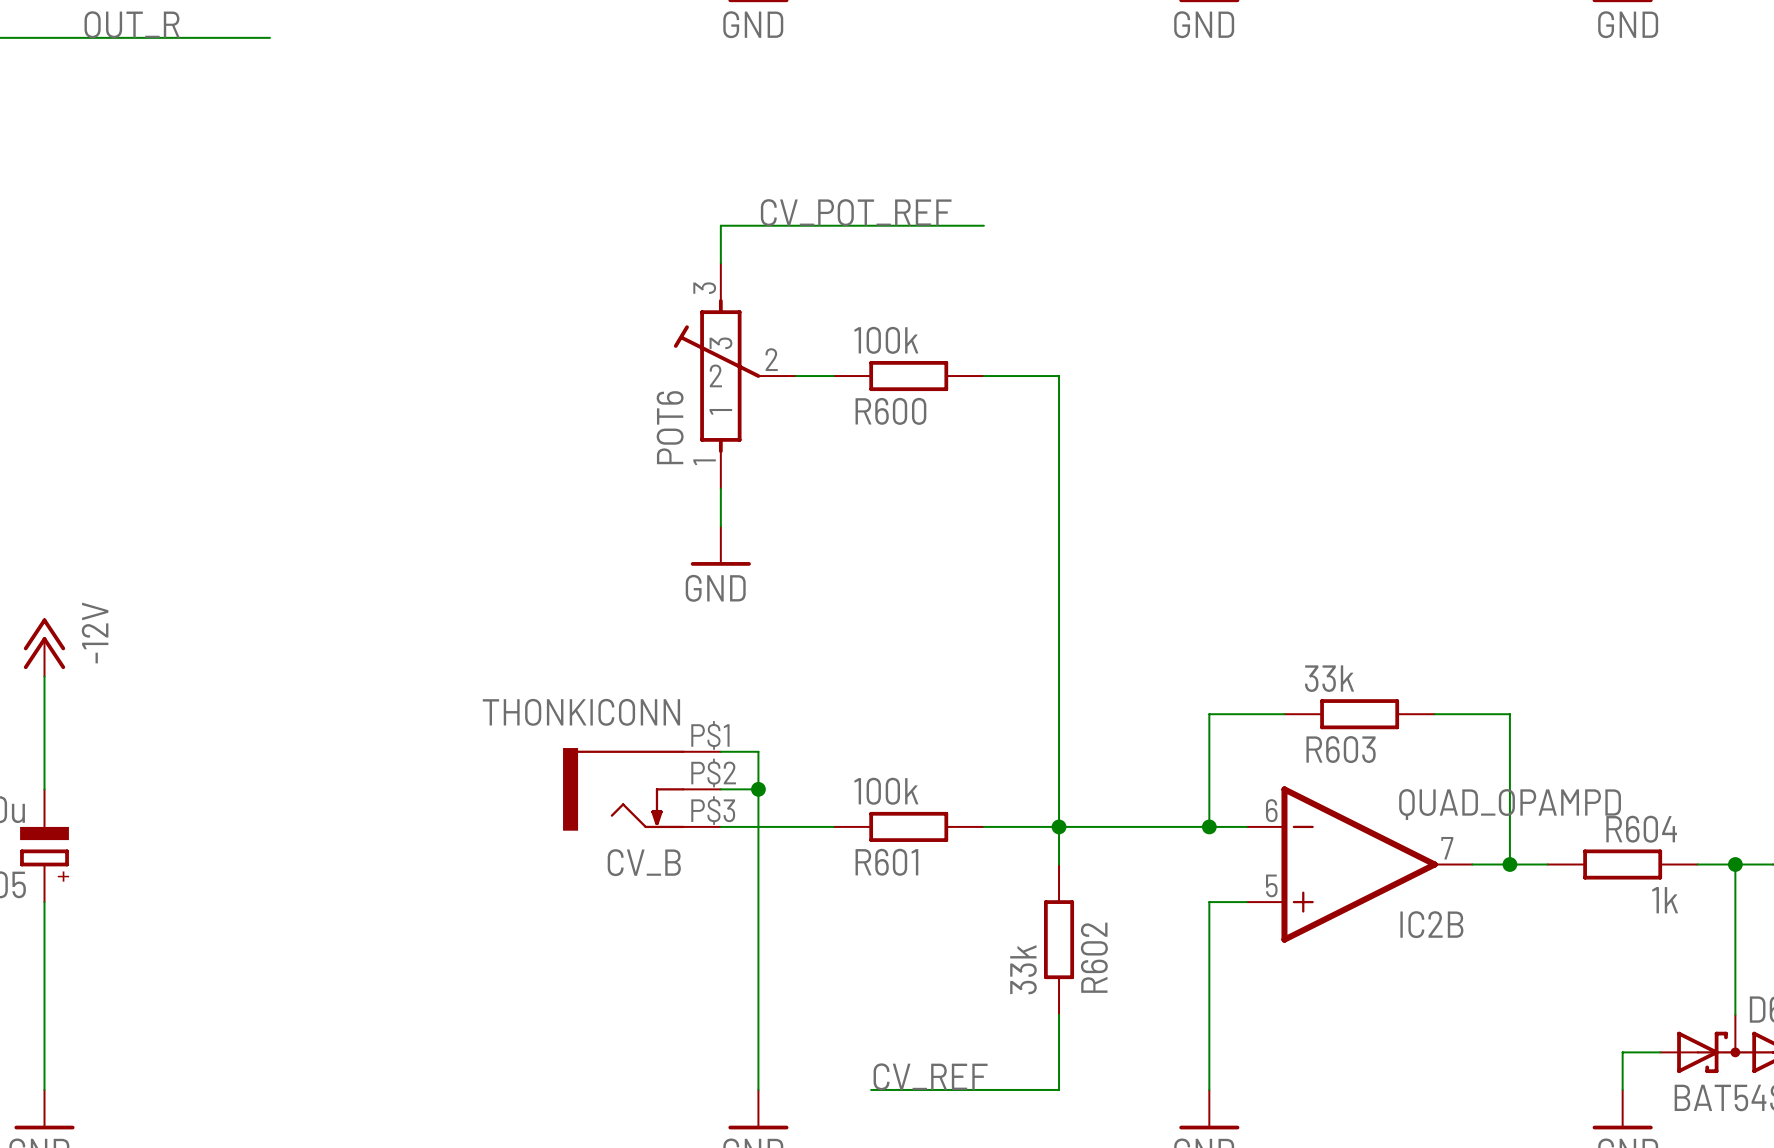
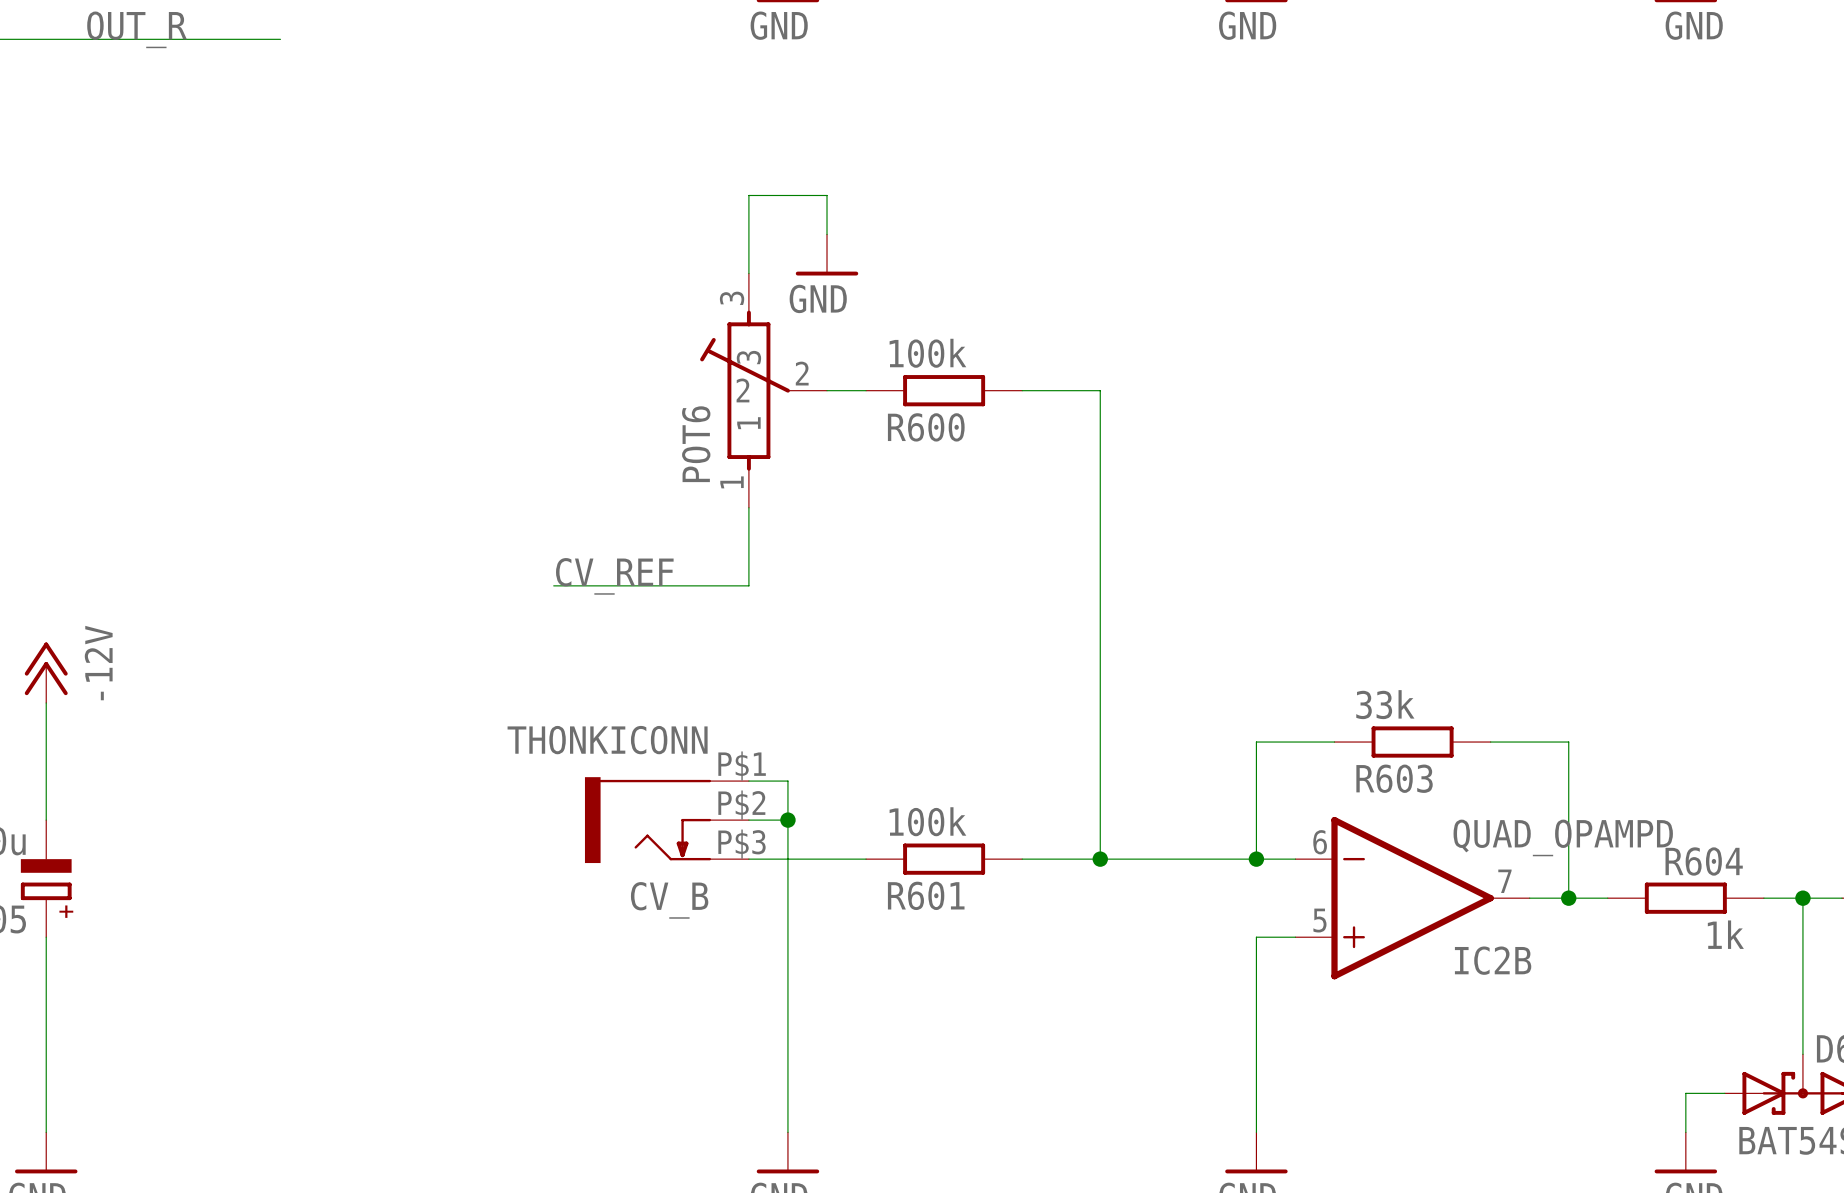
label: CV_POT_REF (856, 212) -> none
wire: (720, 225) (983, 225) -> (748, 234) (748, 195) (827, 195) (827, 234)
wire: none -> (748, 546) (748, 585) (553, 585)
power symbol position: GND (720, 546) -> GND (827, 255)
label: none -> CV_REF (614, 576)
wire: (1059, 826) (1059, 864) -> none
R602: 33k (1059, 939) -> none
wire: (1059, 1014) (1059, 1089) (871, 1089) -> none
label: CV_REF (930, 1076) -> none

